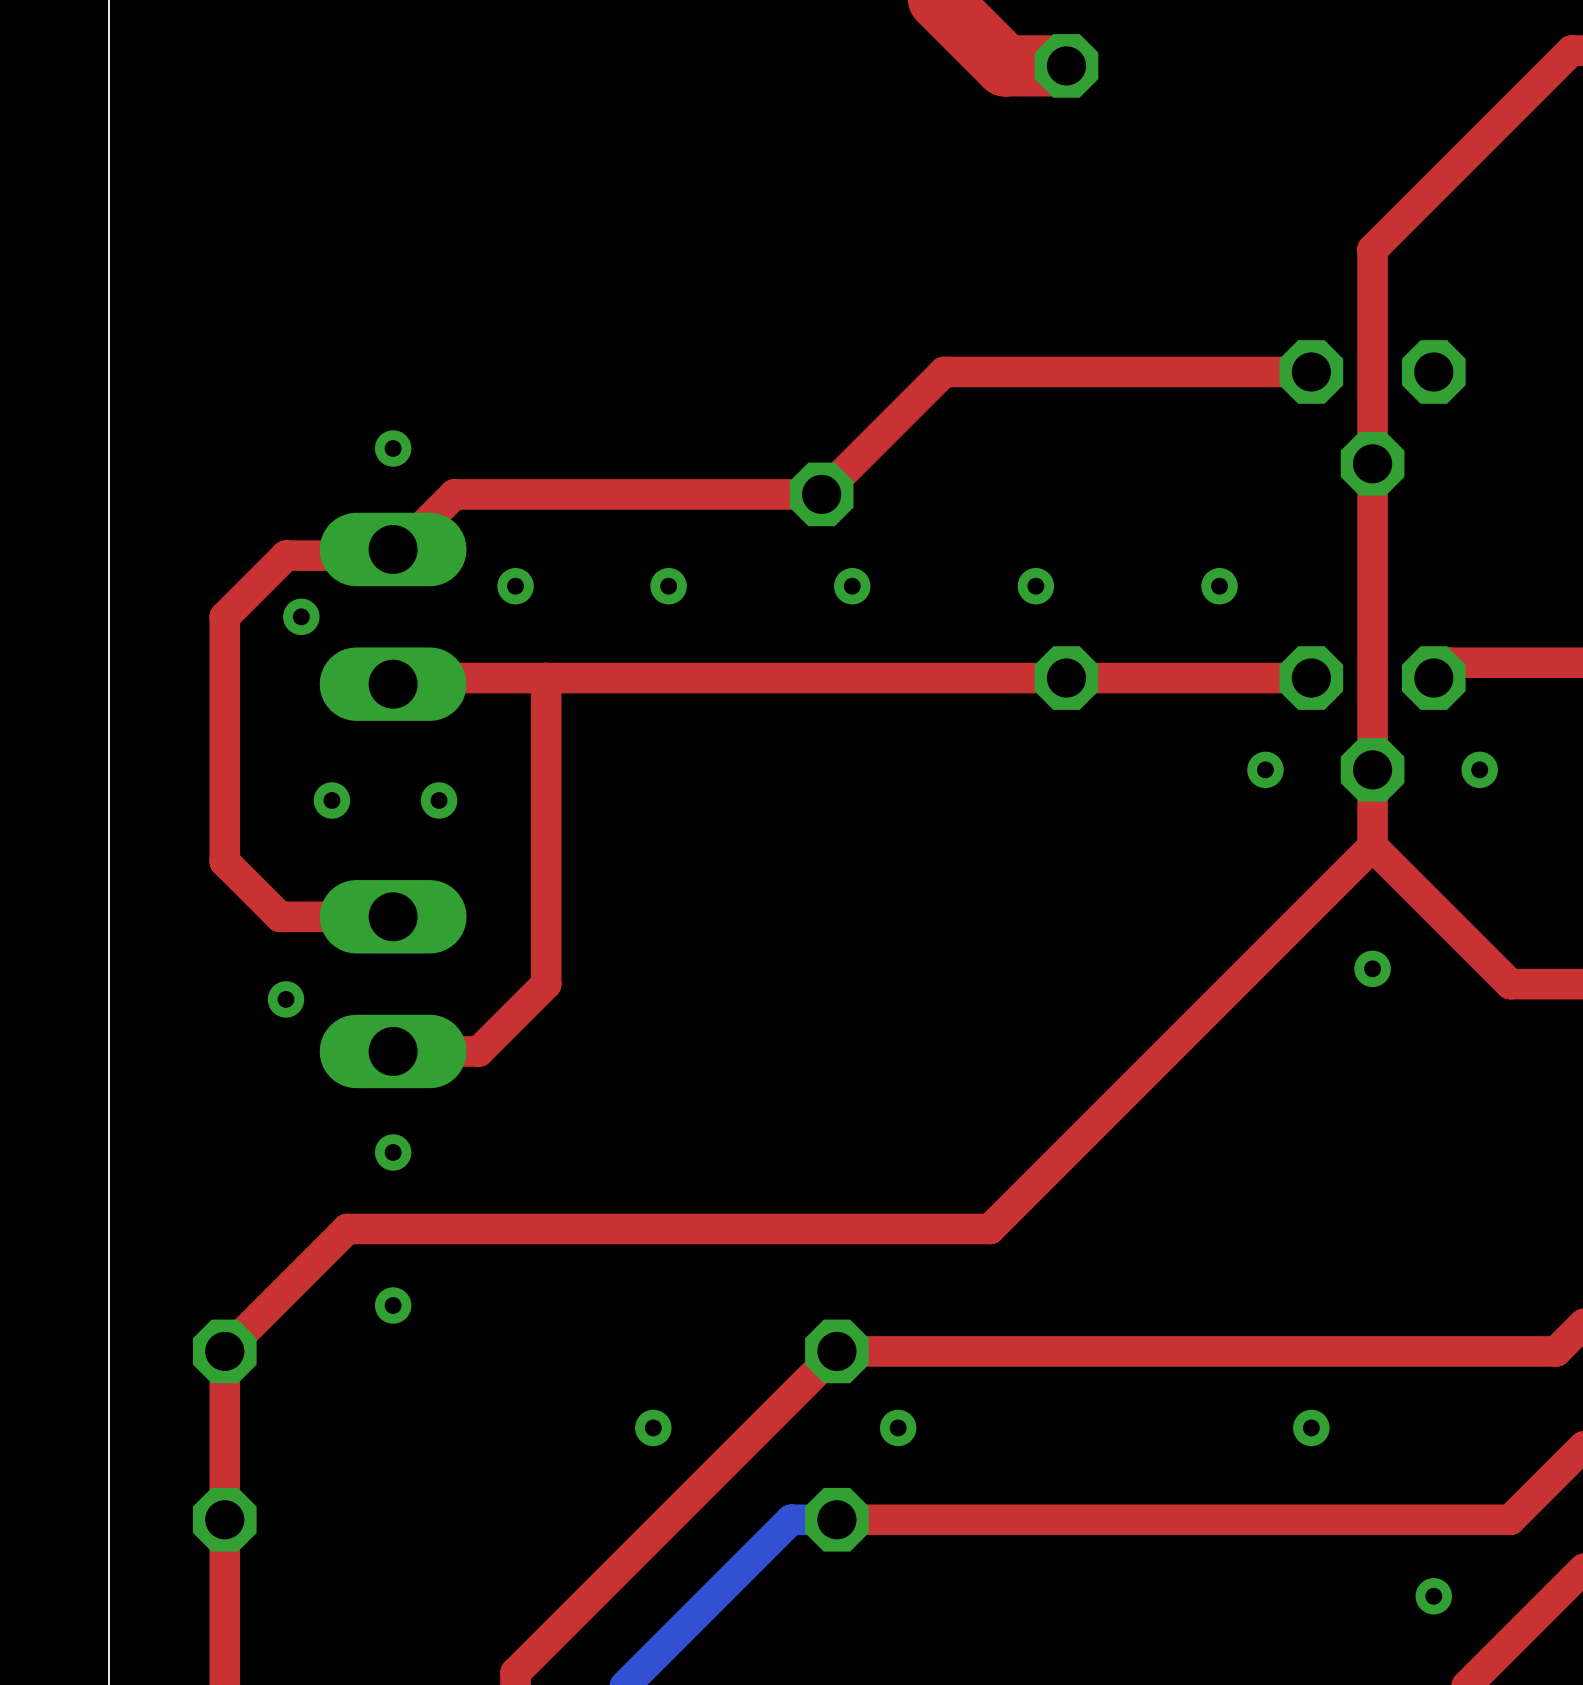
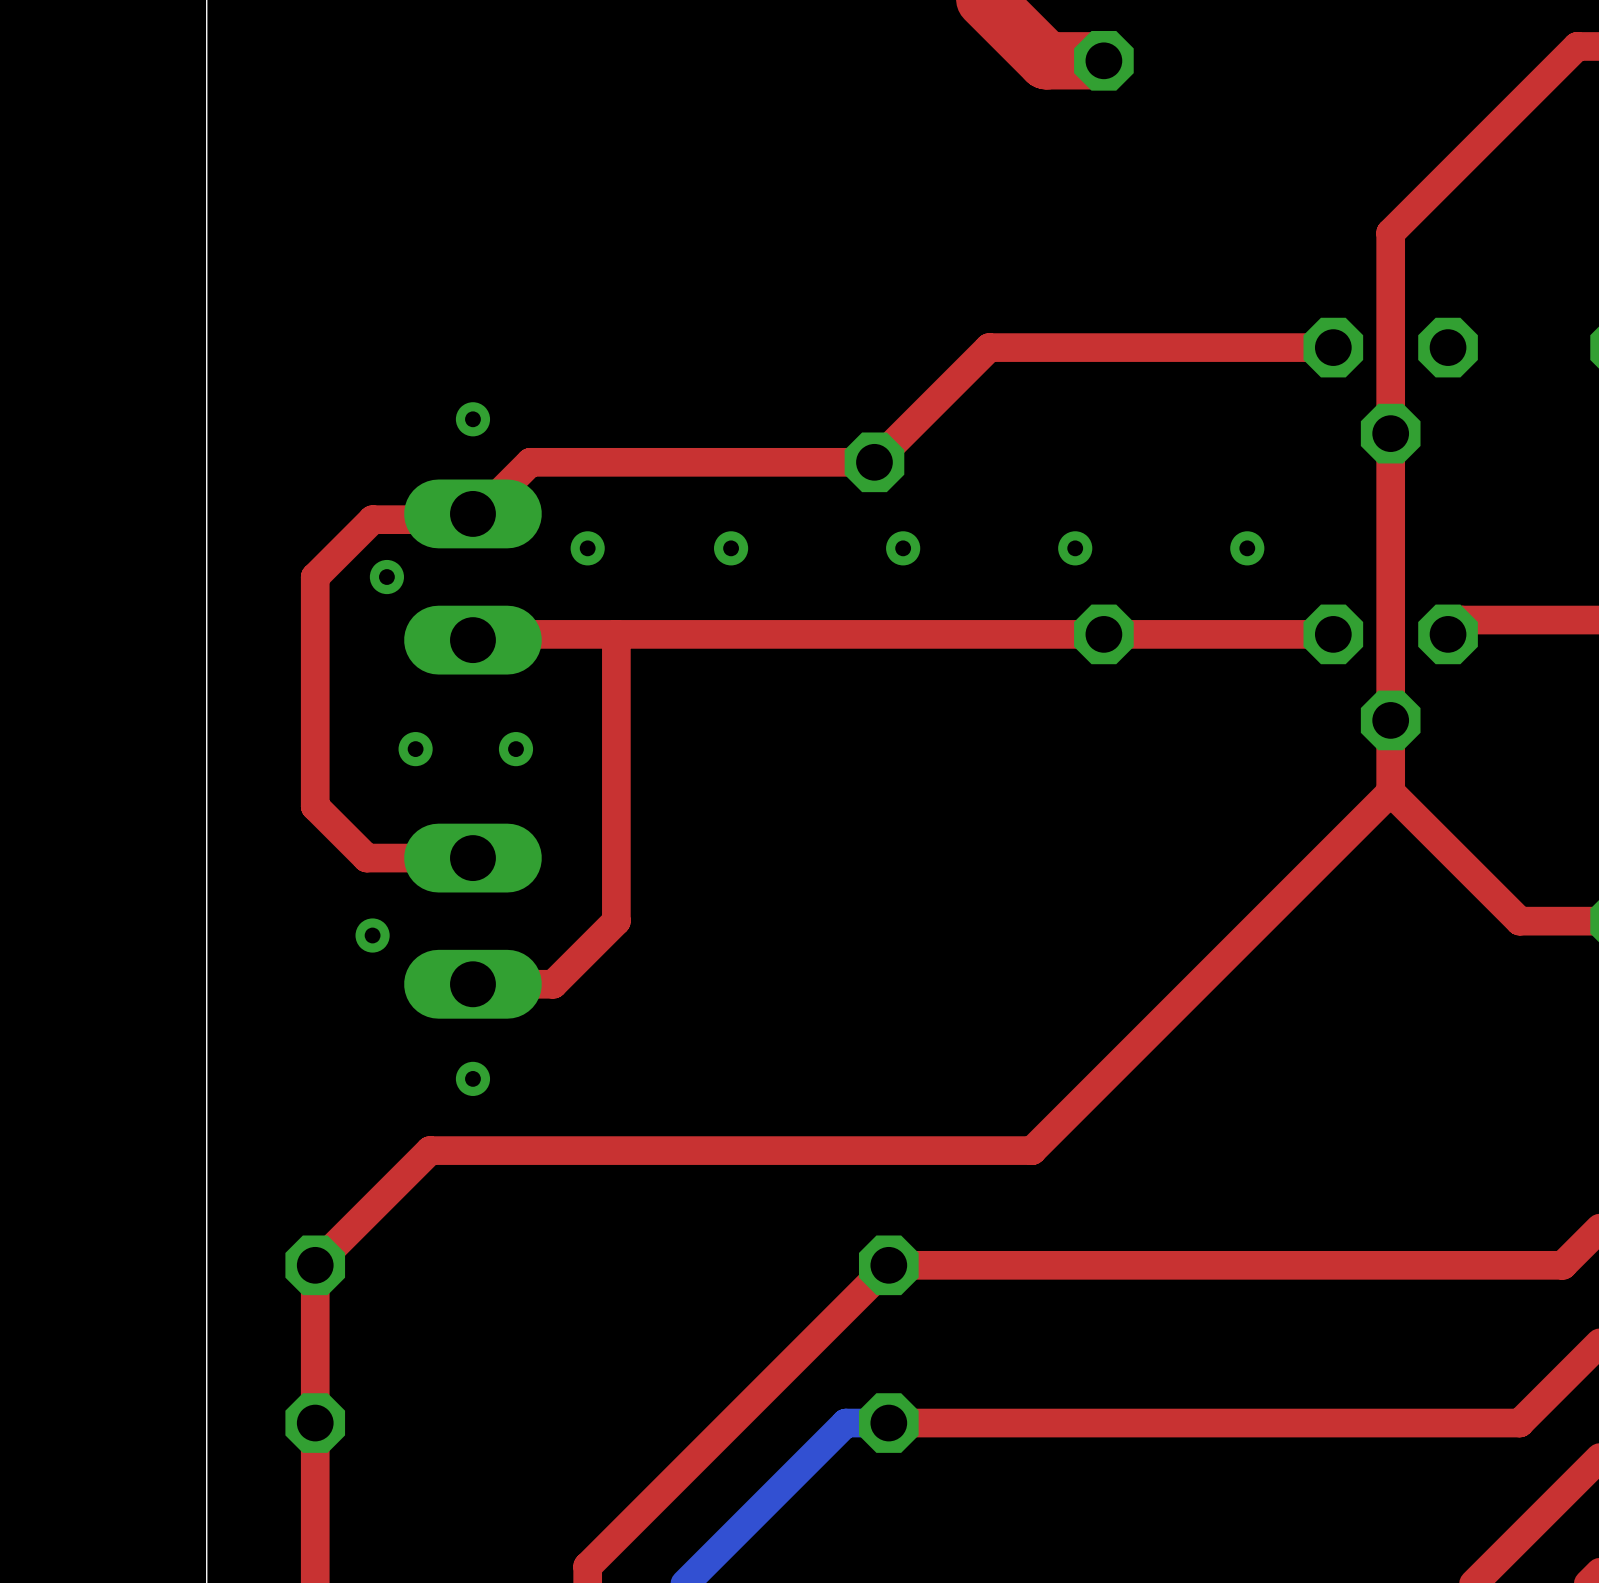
via: (1265, 769) -> none
via: (1479, 769) -> none
via: (1372, 968) -> none
via: (393, 1305) -> none
via: (653, 1427) -> none
via: (898, 1427) -> none
via: (1311, 1427) -> none
via: (1433, 1596) -> none

